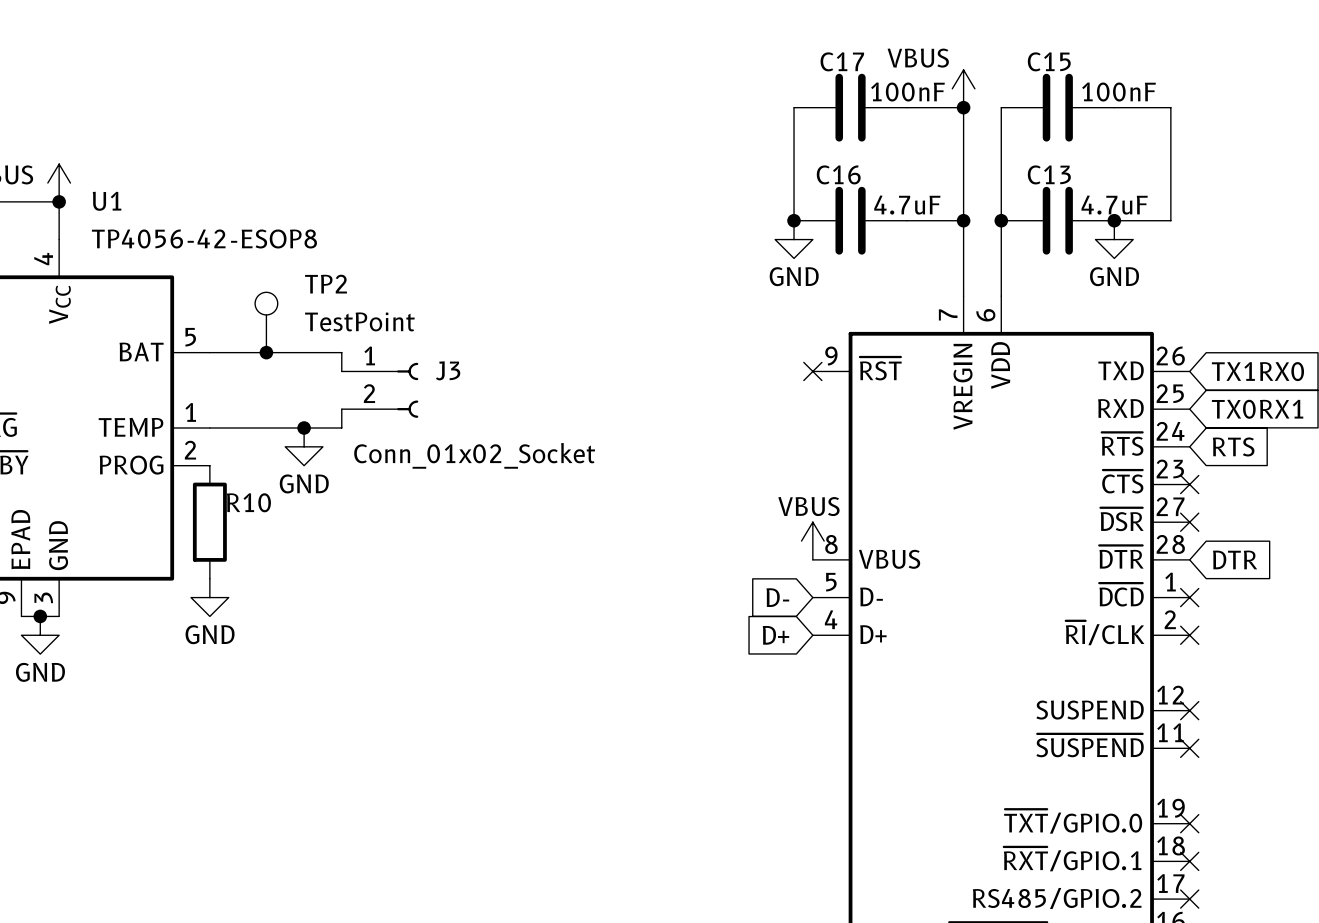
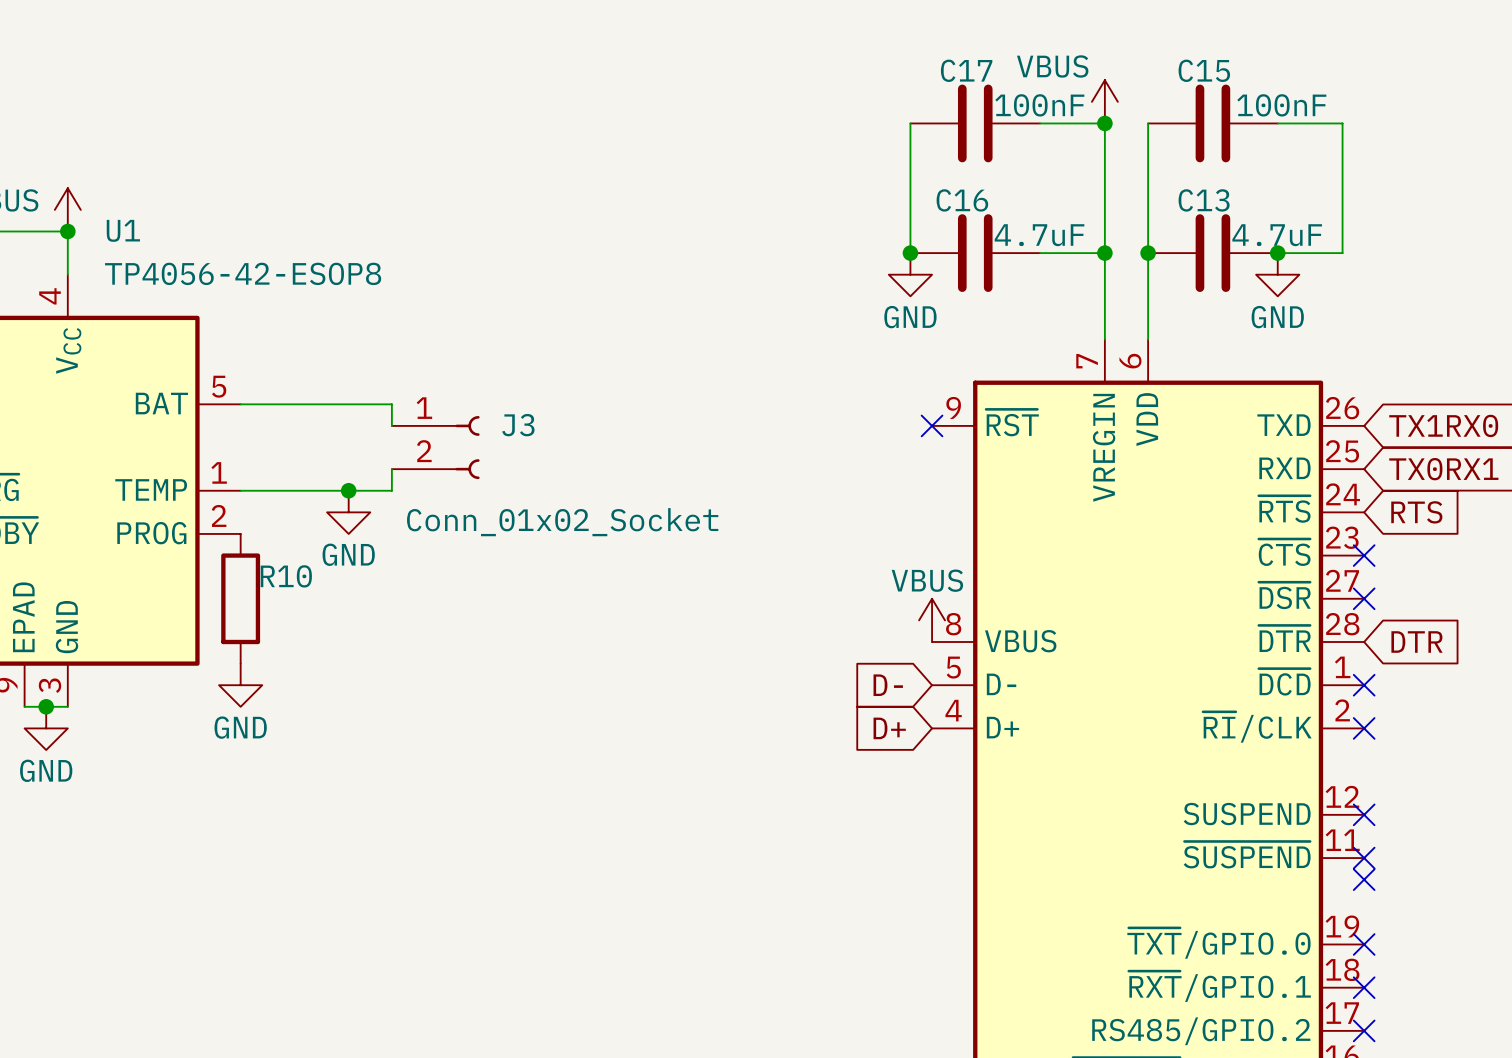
TP2: TestPoint (266, 322) -> none
junction: (266, 352) -> none
no-connect mark: none -> (1364, 879)

